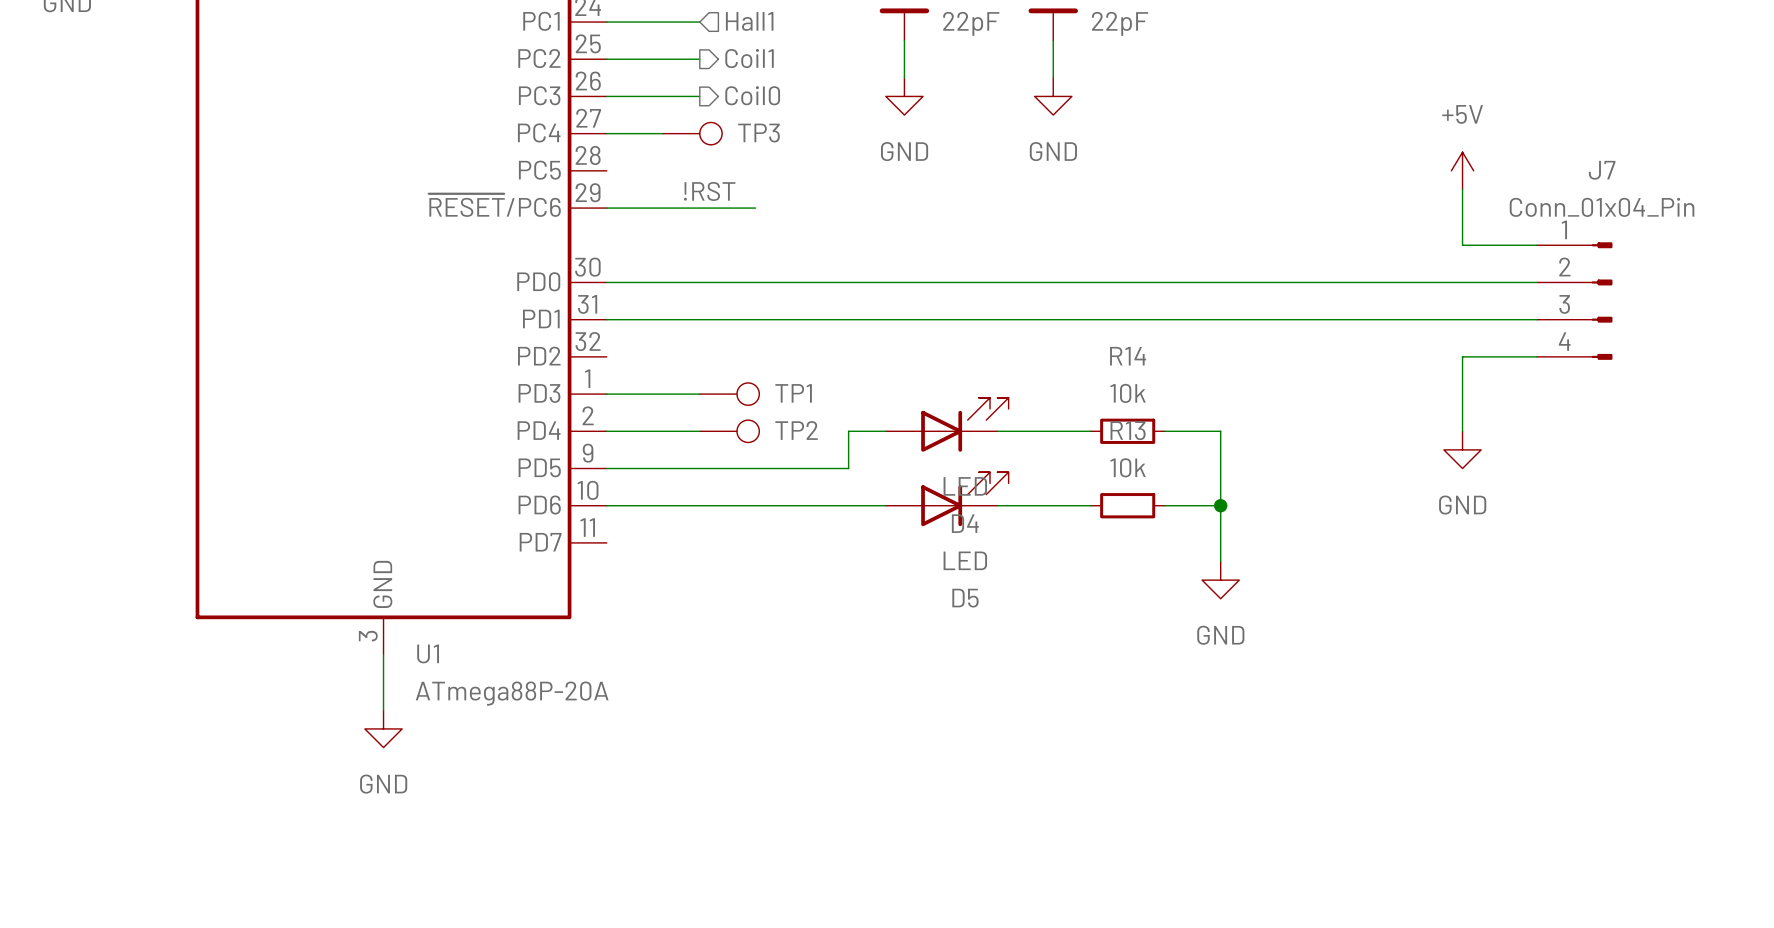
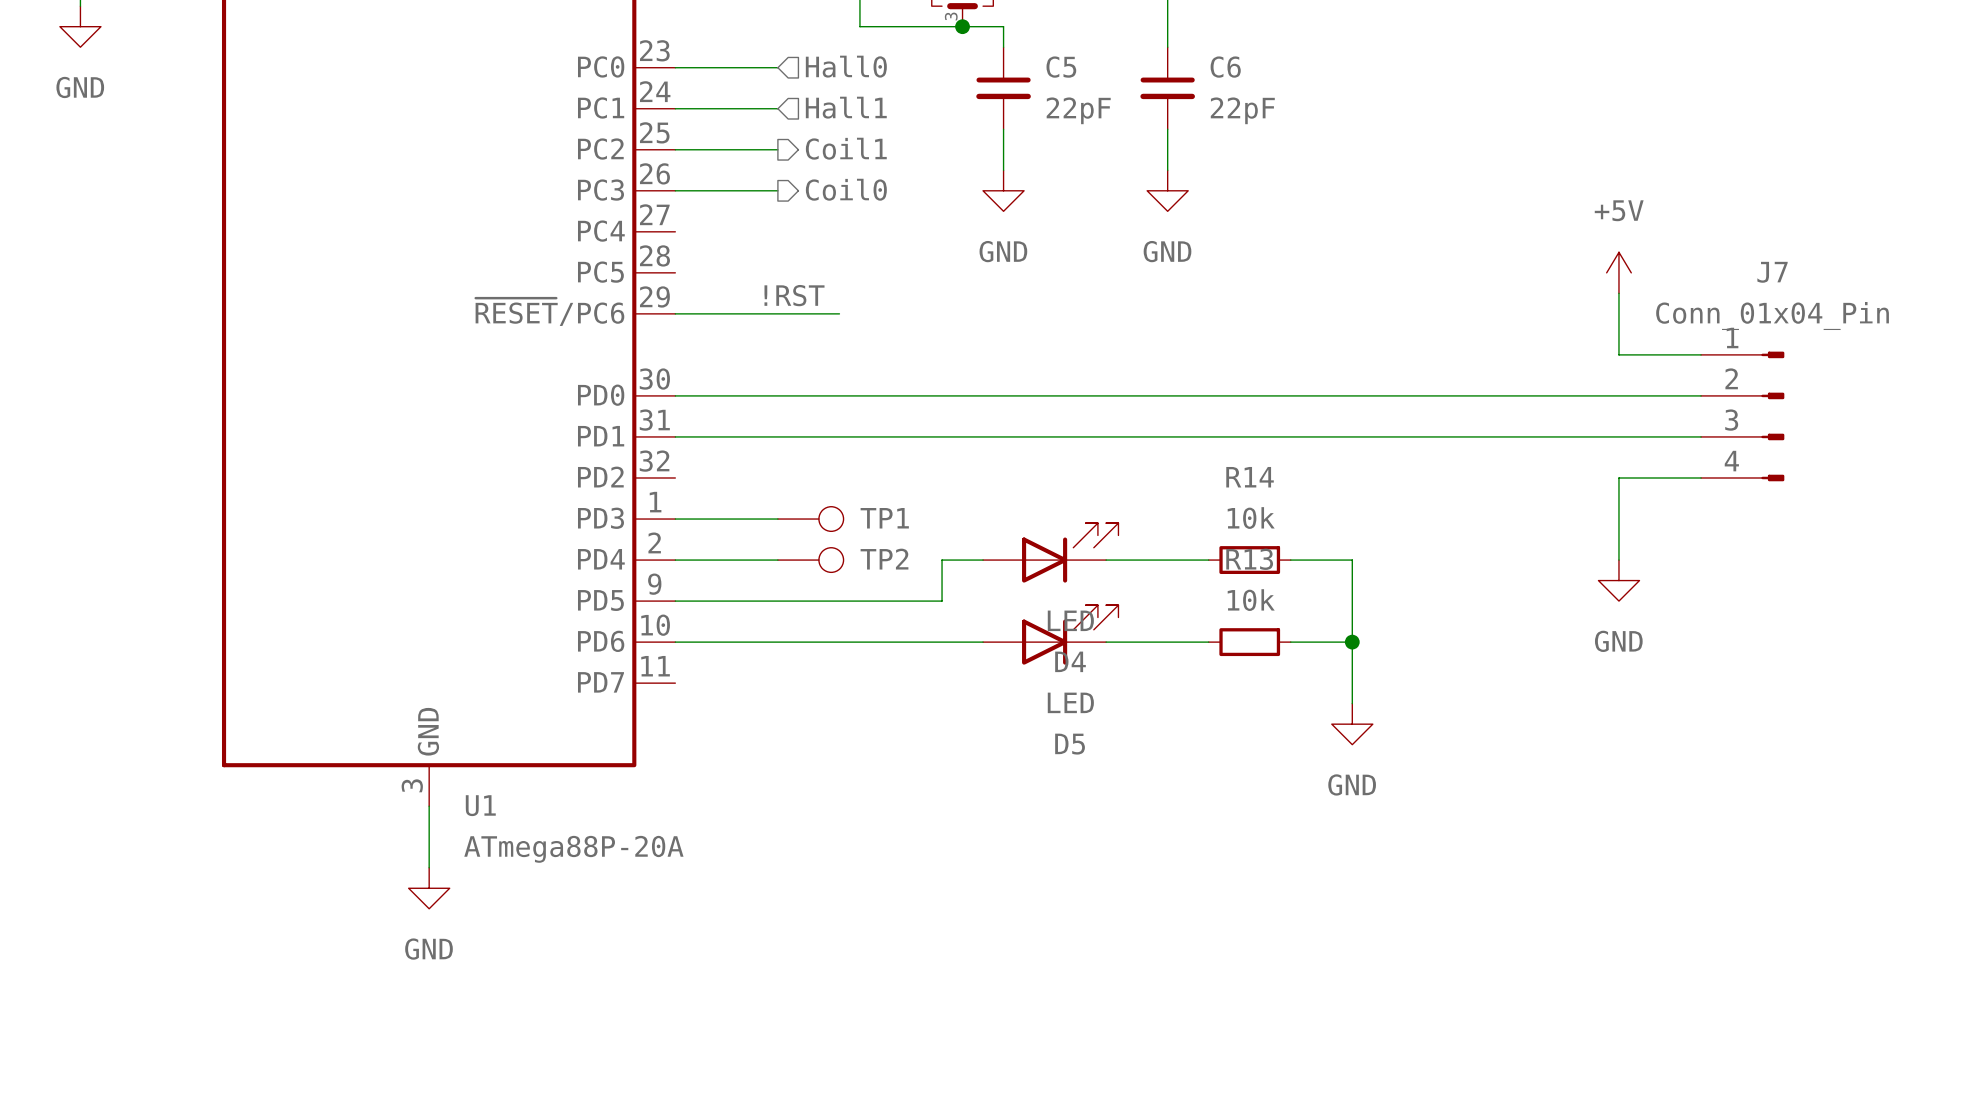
wire: (606, 133) (662, 133) -> none
TP3: (692, 133) -> none

